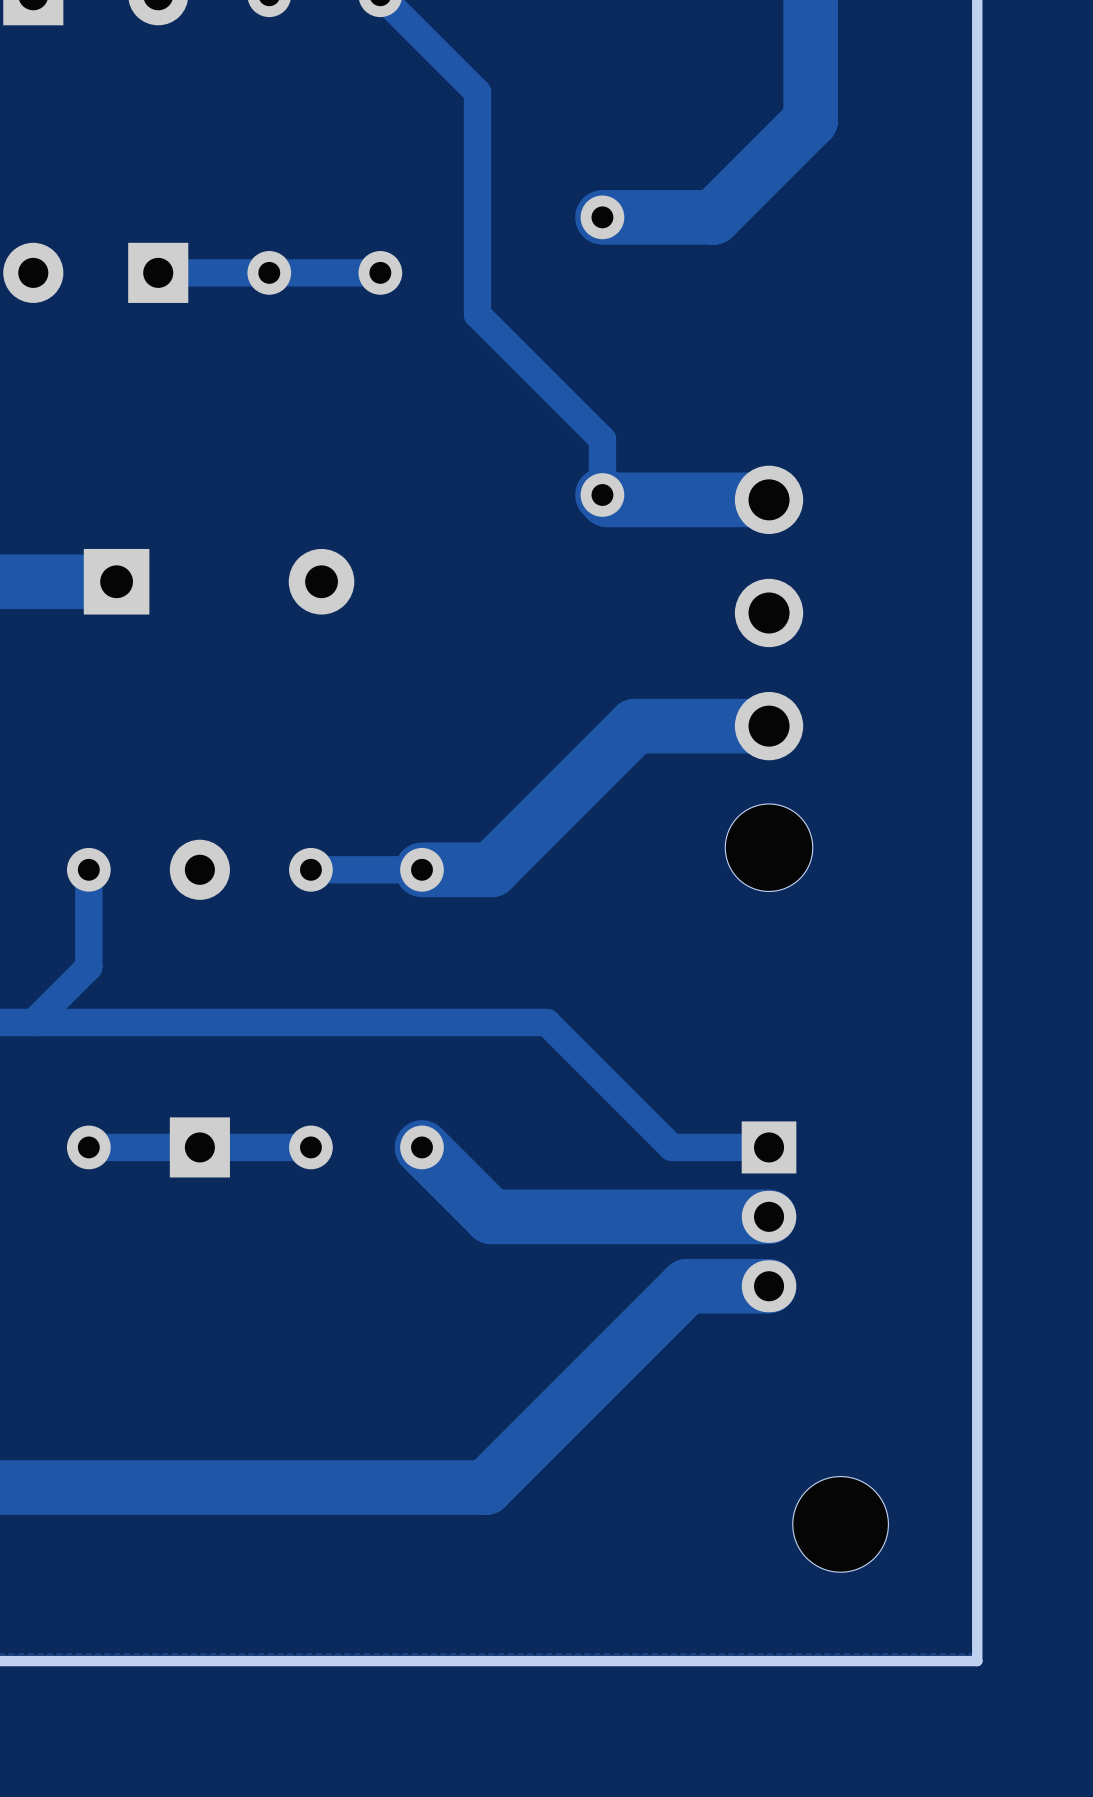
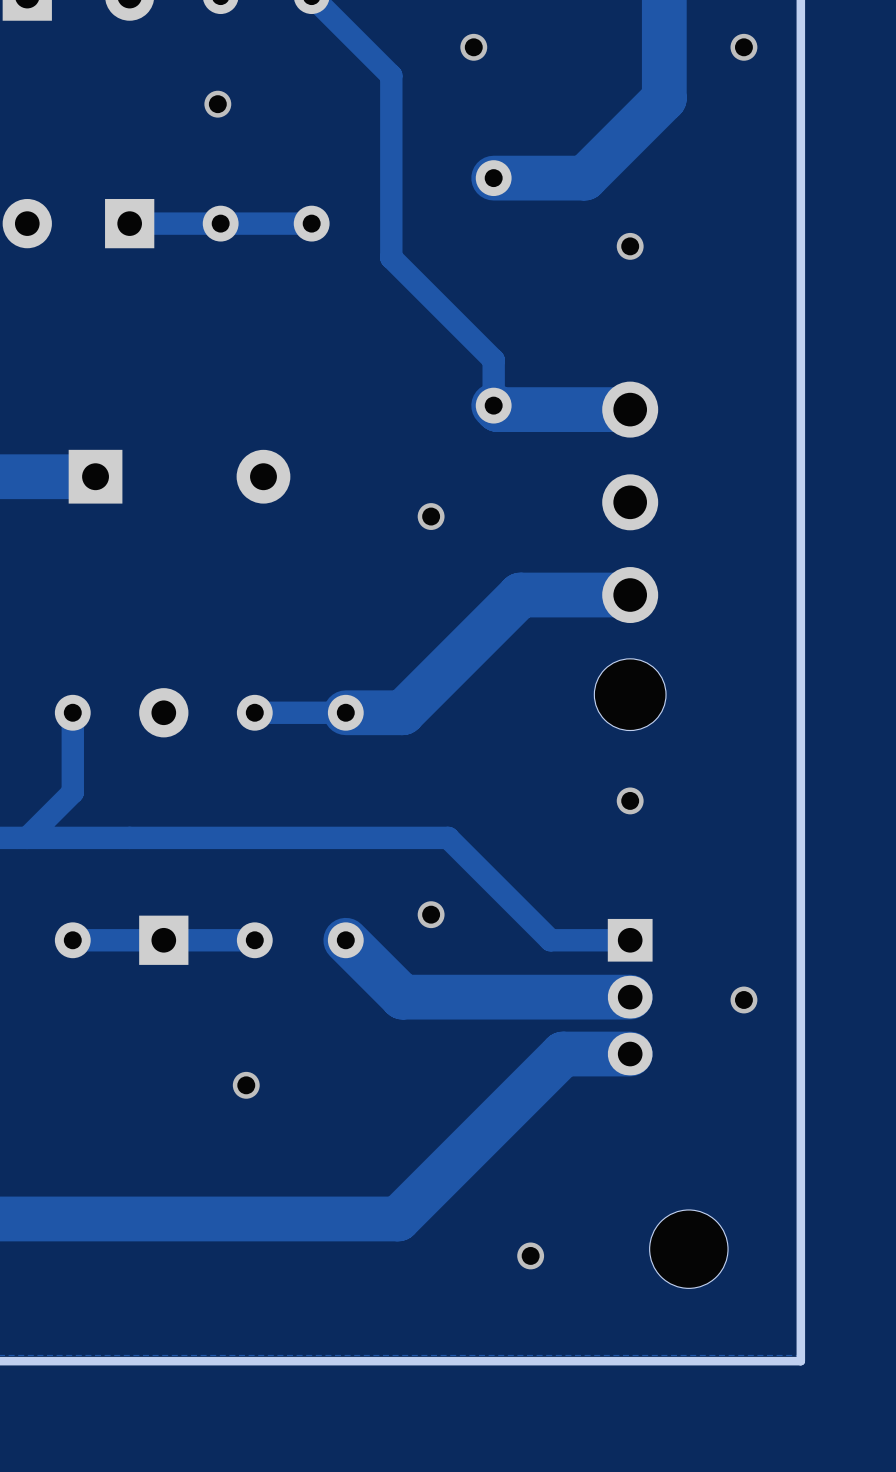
via: none -> (473, 47)
via: none -> (743, 47)
via: none -> (217, 104)
via: none -> (630, 246)
via: none -> (431, 516)
via: none -> (630, 800)
via: none -> (431, 914)
via: none -> (743, 999)
via: none -> (246, 1085)
via: none -> (530, 1255)

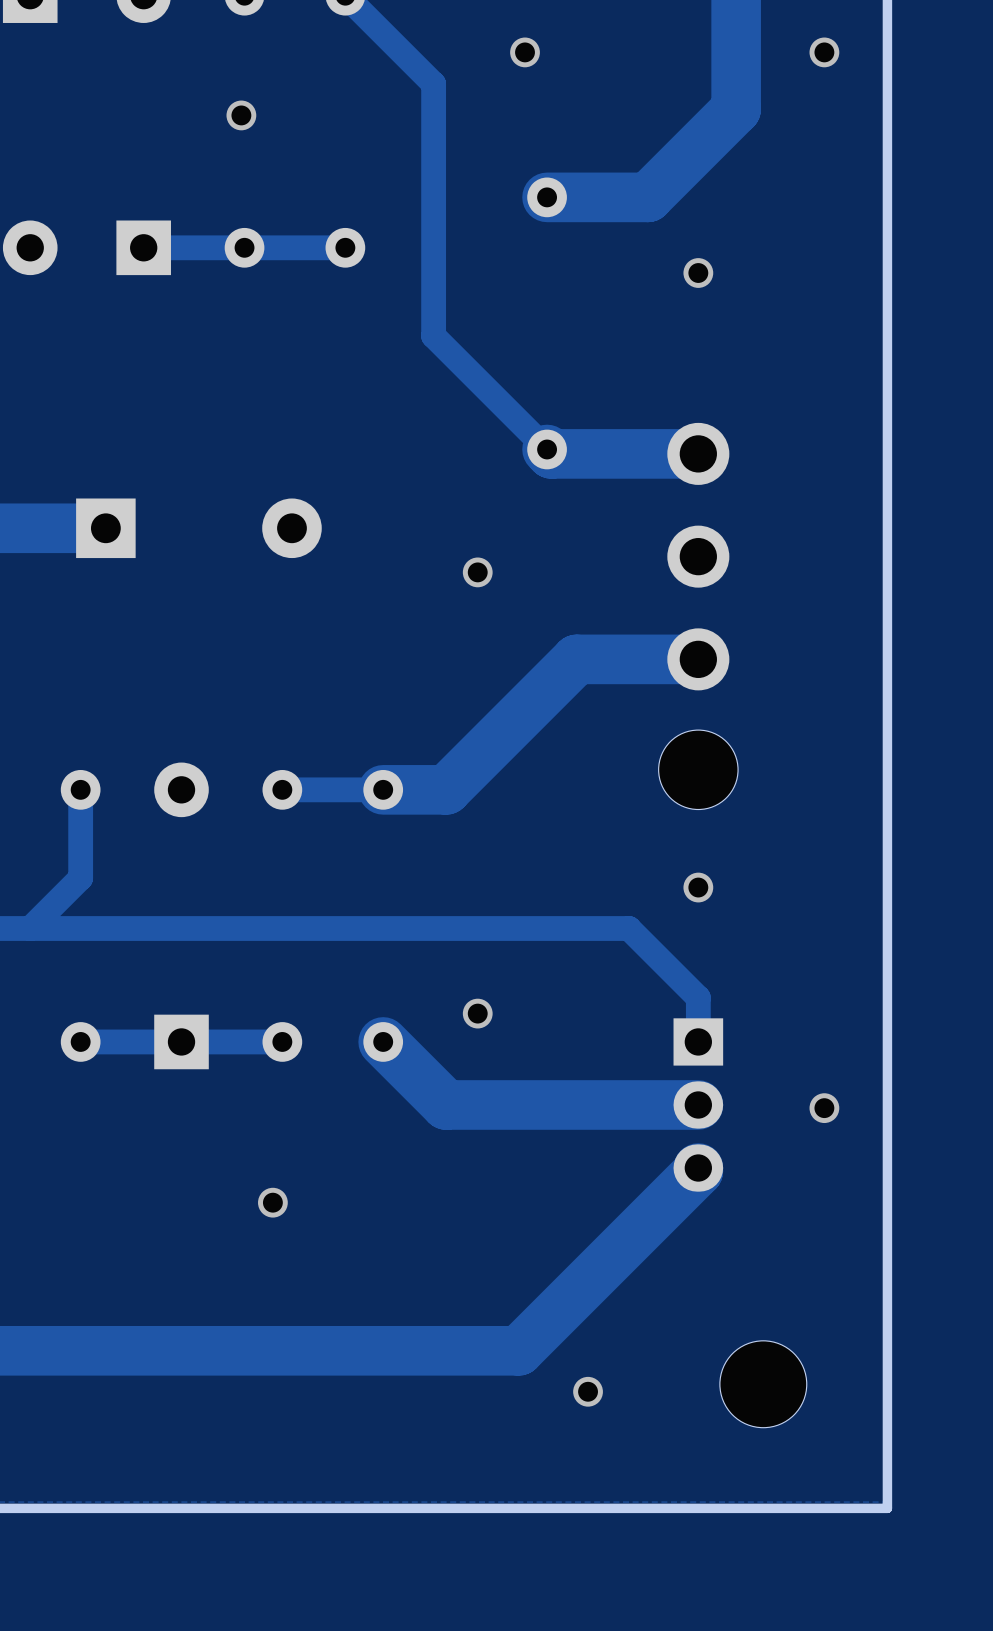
track: (391, 257) (493, 360) (493, 405) -> (433, 285) (433, 336) (547, 449)
track: (448, 837) (550, 940) (630, 940) -> (496, 928) (629, 928) (698, 997) (698, 1041)
track: (630, 1054) (563, 1054) (398, 1218) -> (698, 1168) (698, 1171) (518, 1350) (441, 1350)

